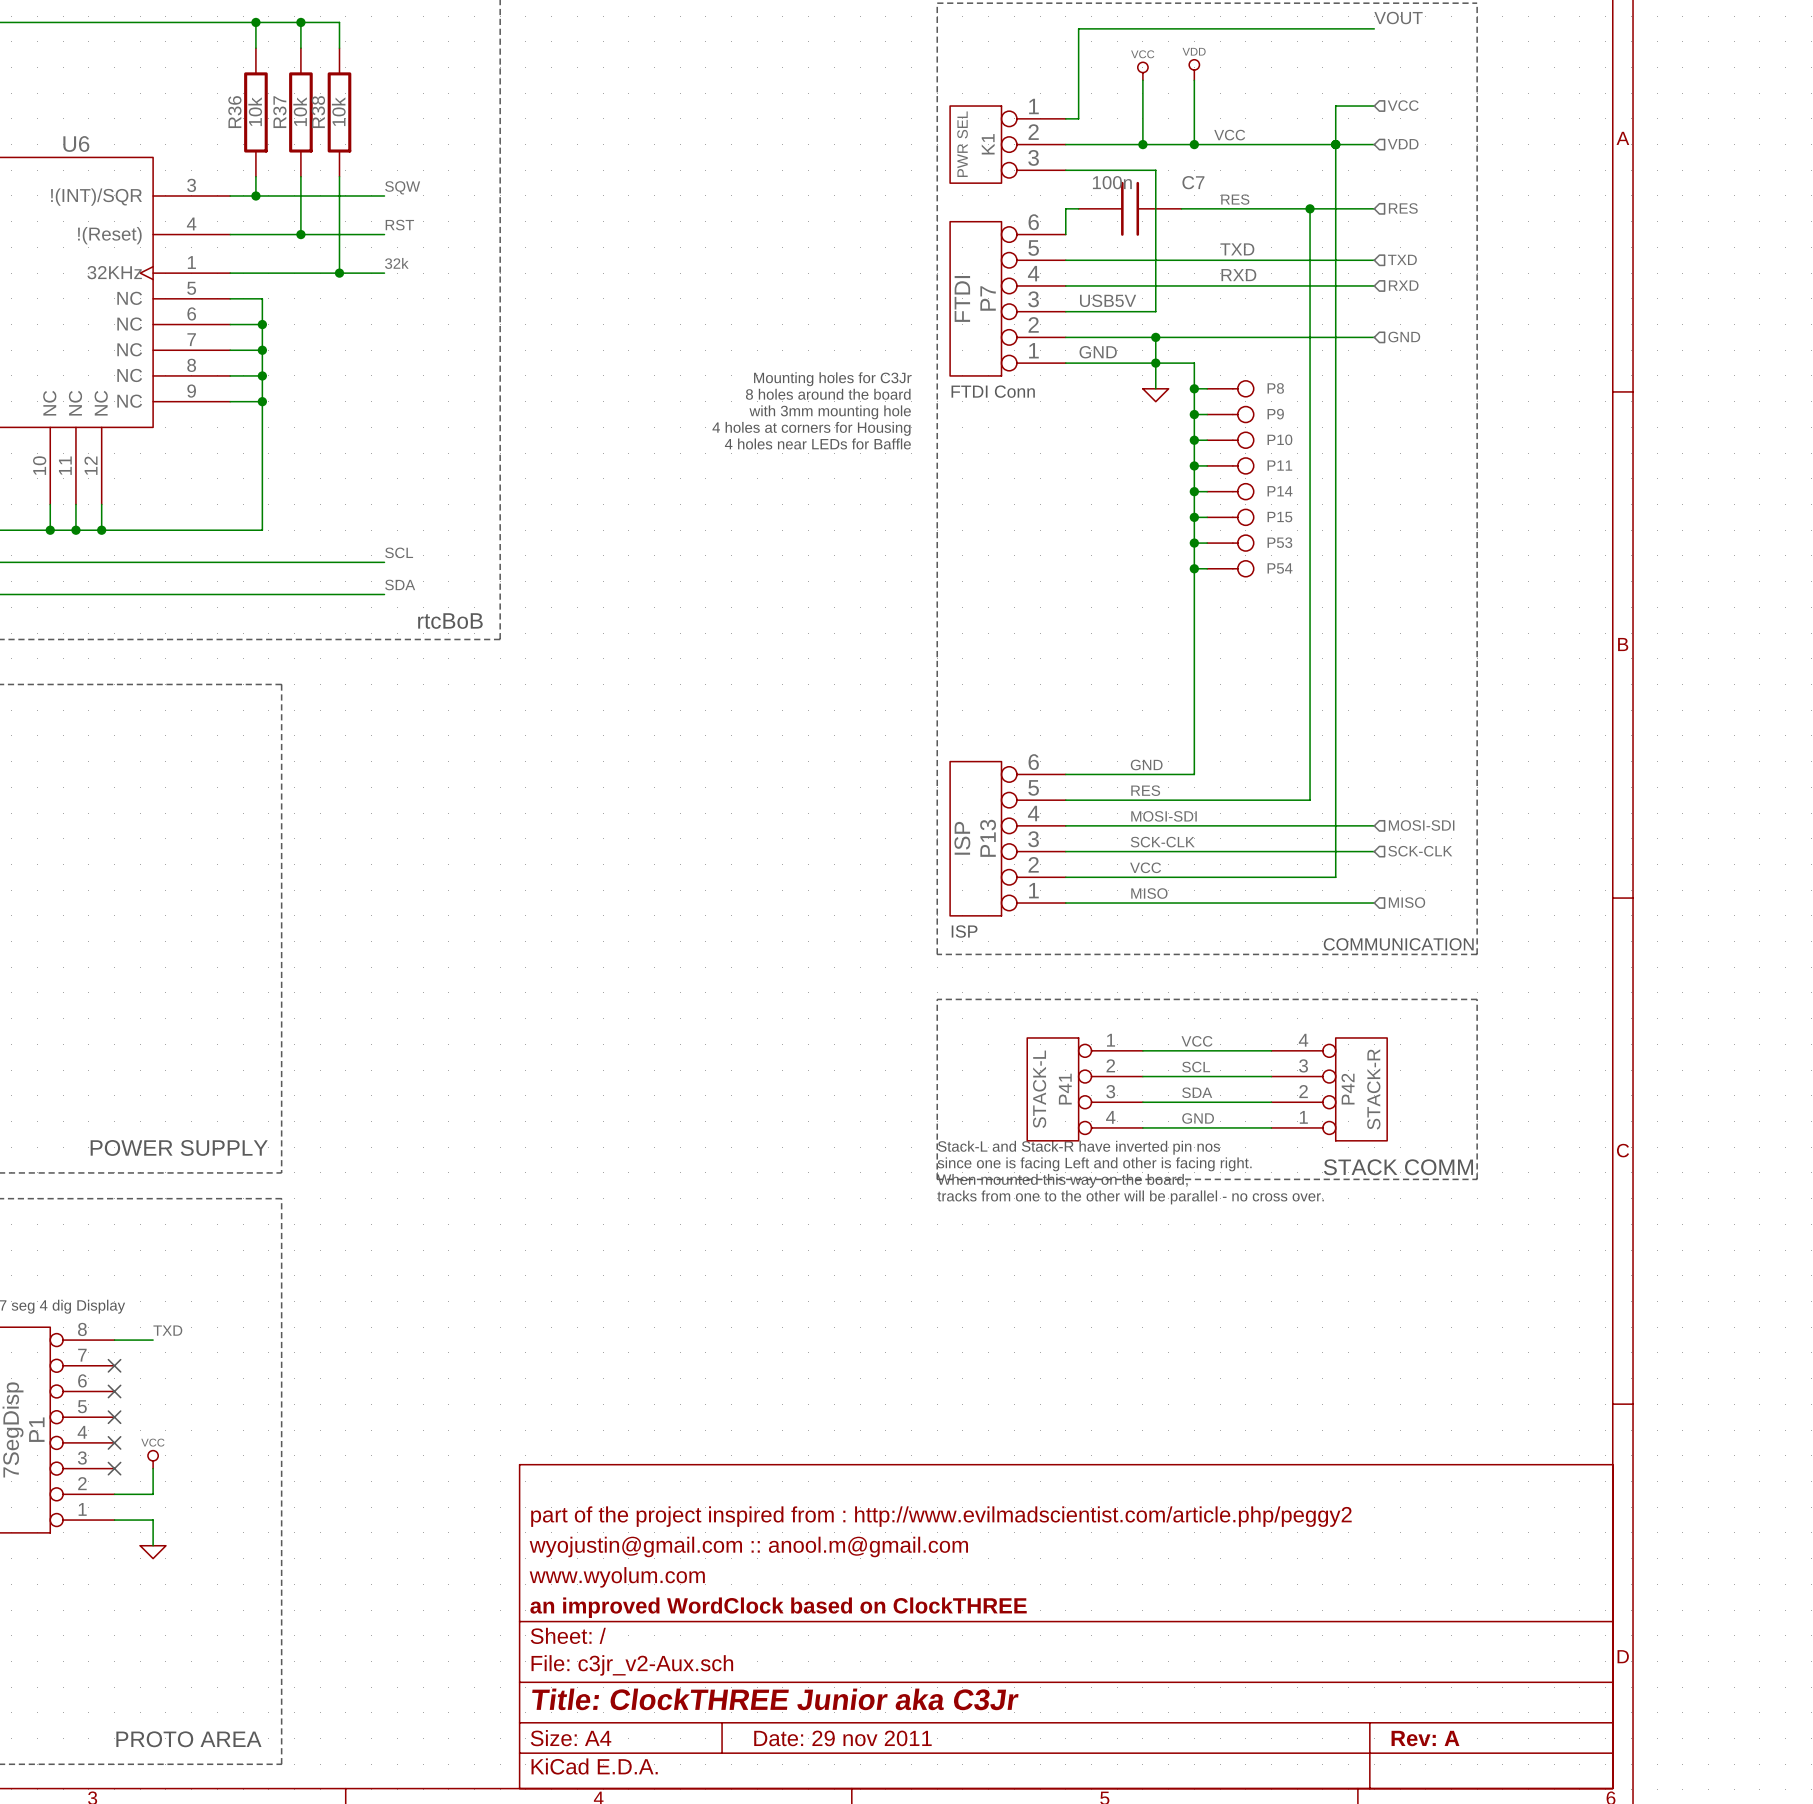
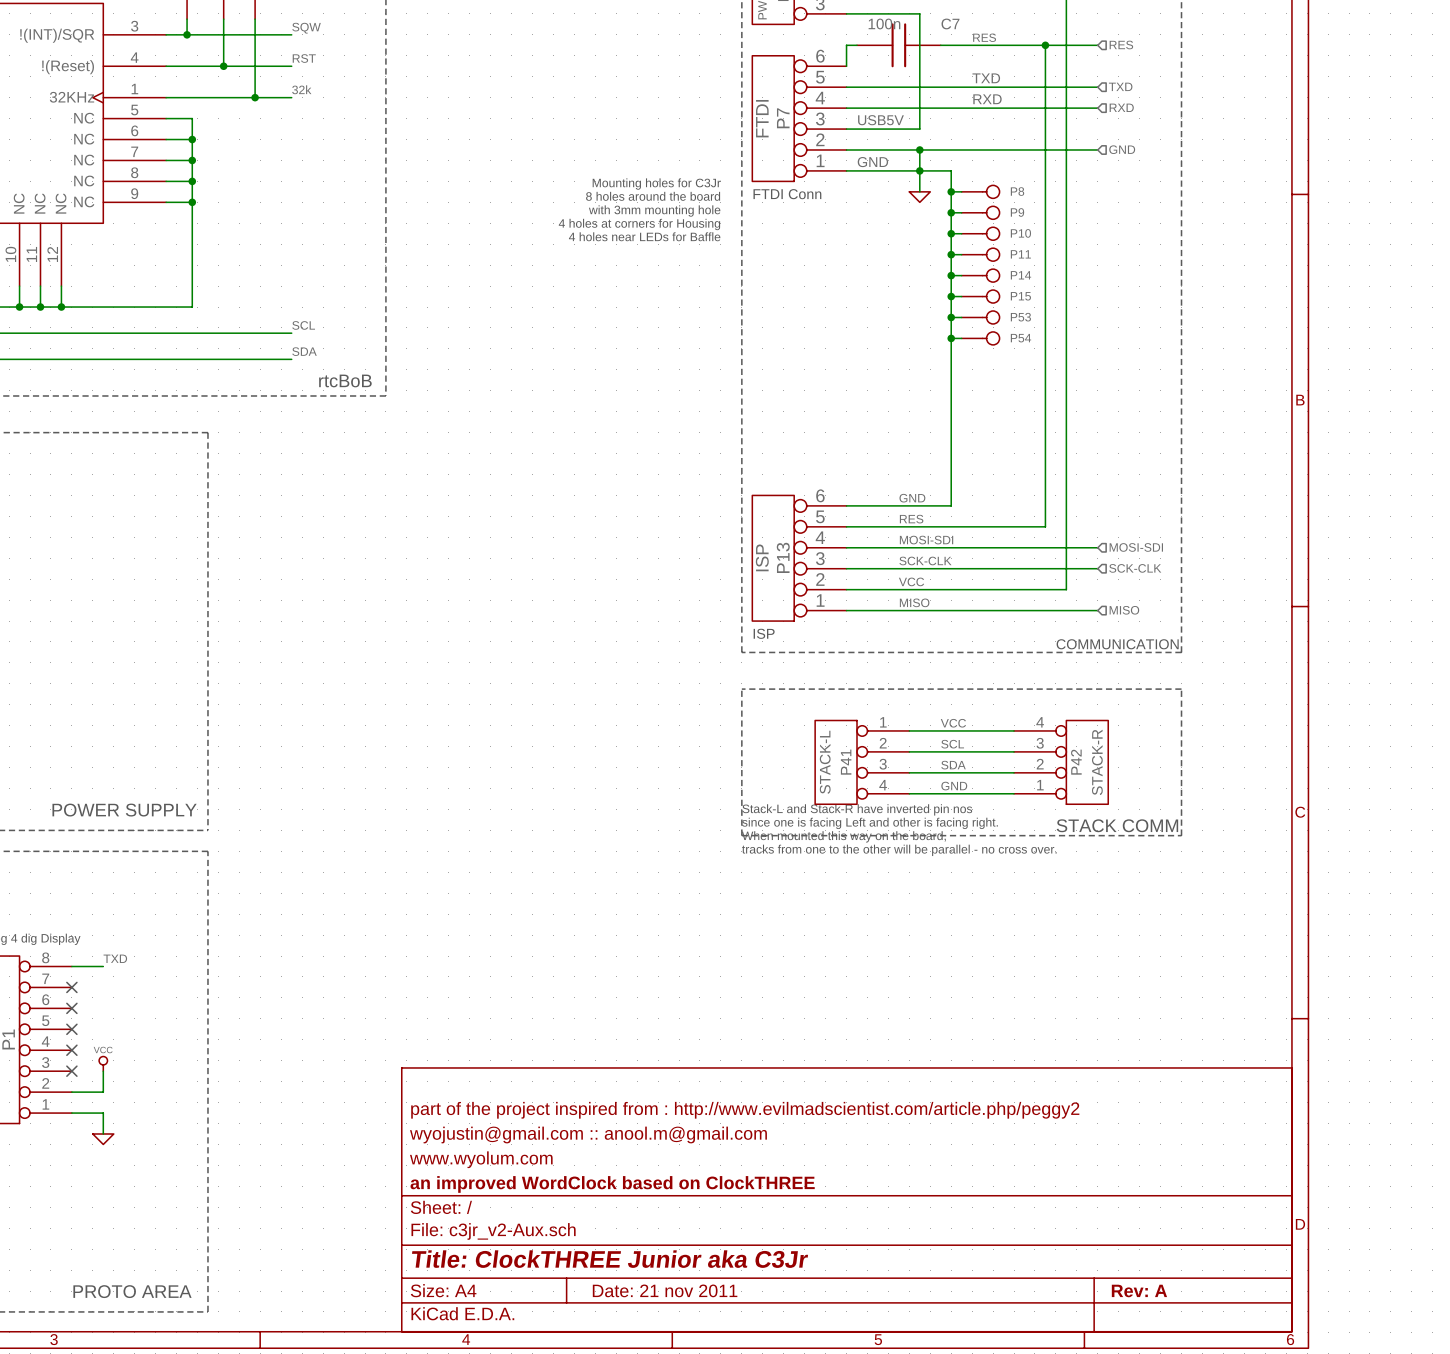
title block: Date: 29 nov 2011 (842, 1738) -> Date: 21 nov 2011 (665, 1290)

